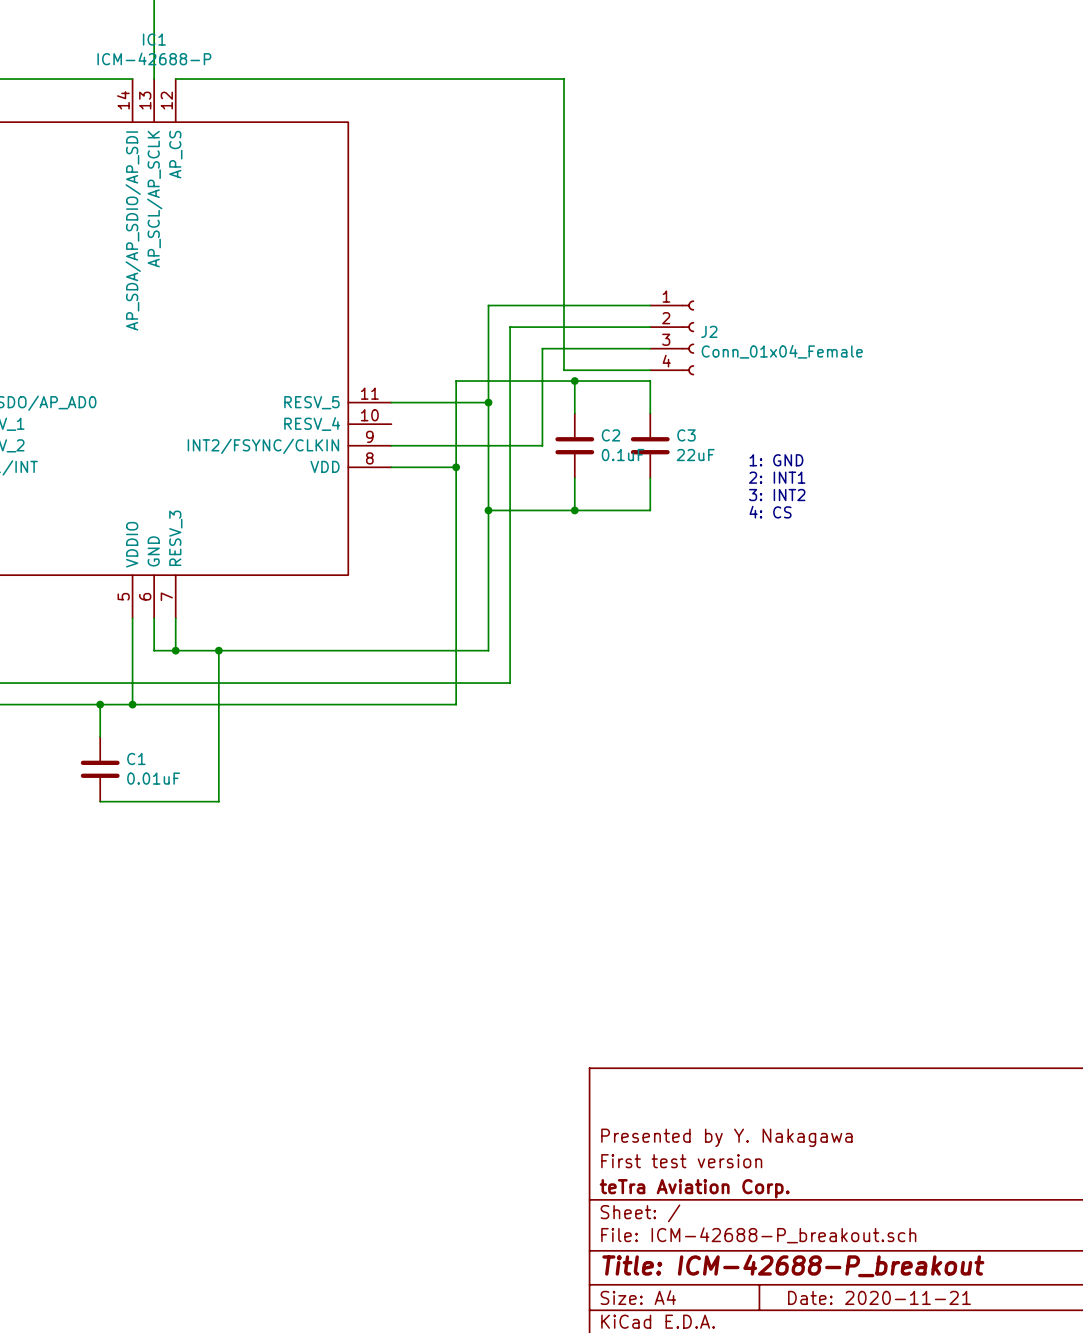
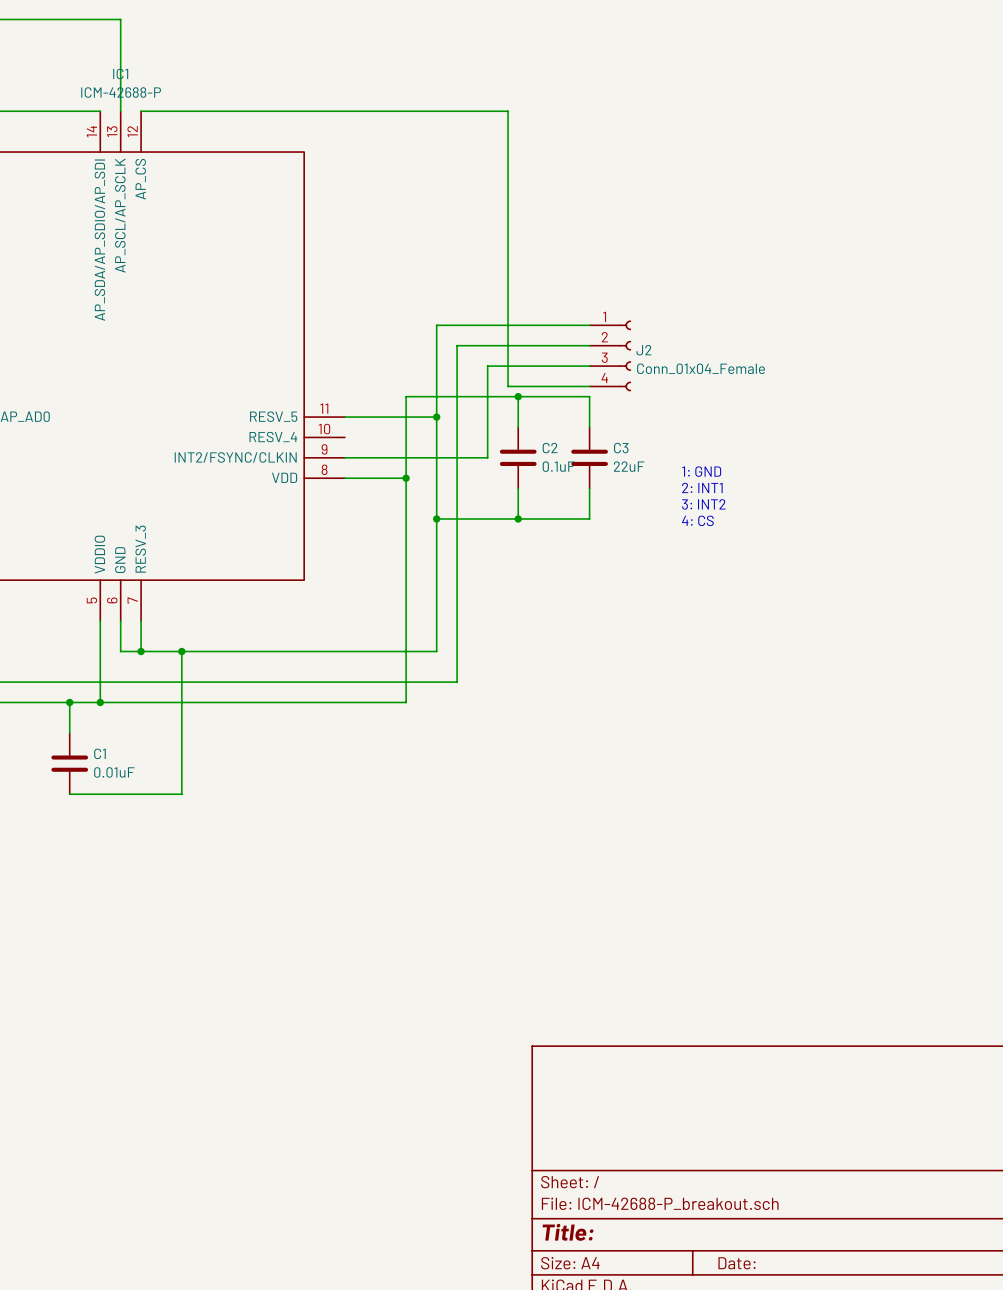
title block: Presented by Y. Nakagawa (726, 1137) -> none
title block: First test version (681, 1161) -> none
title block: teTra Aviation Corp. (694, 1188) -> none
title block: Title: ICM-42688-P_breakout (793, 1265) -> Title: (568, 1232)
title block: Date: 2020-11-21 (879, 1297) -> Date: (736, 1263)

